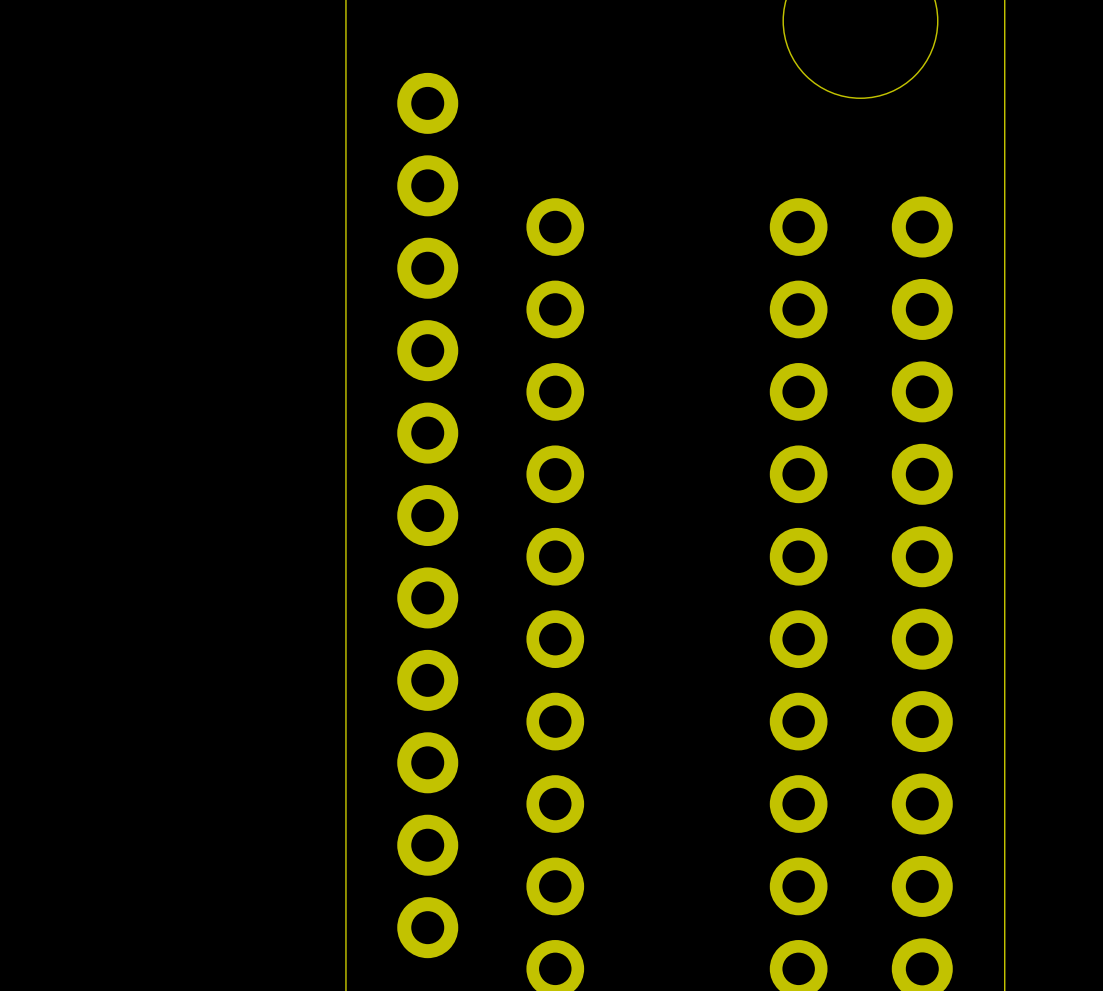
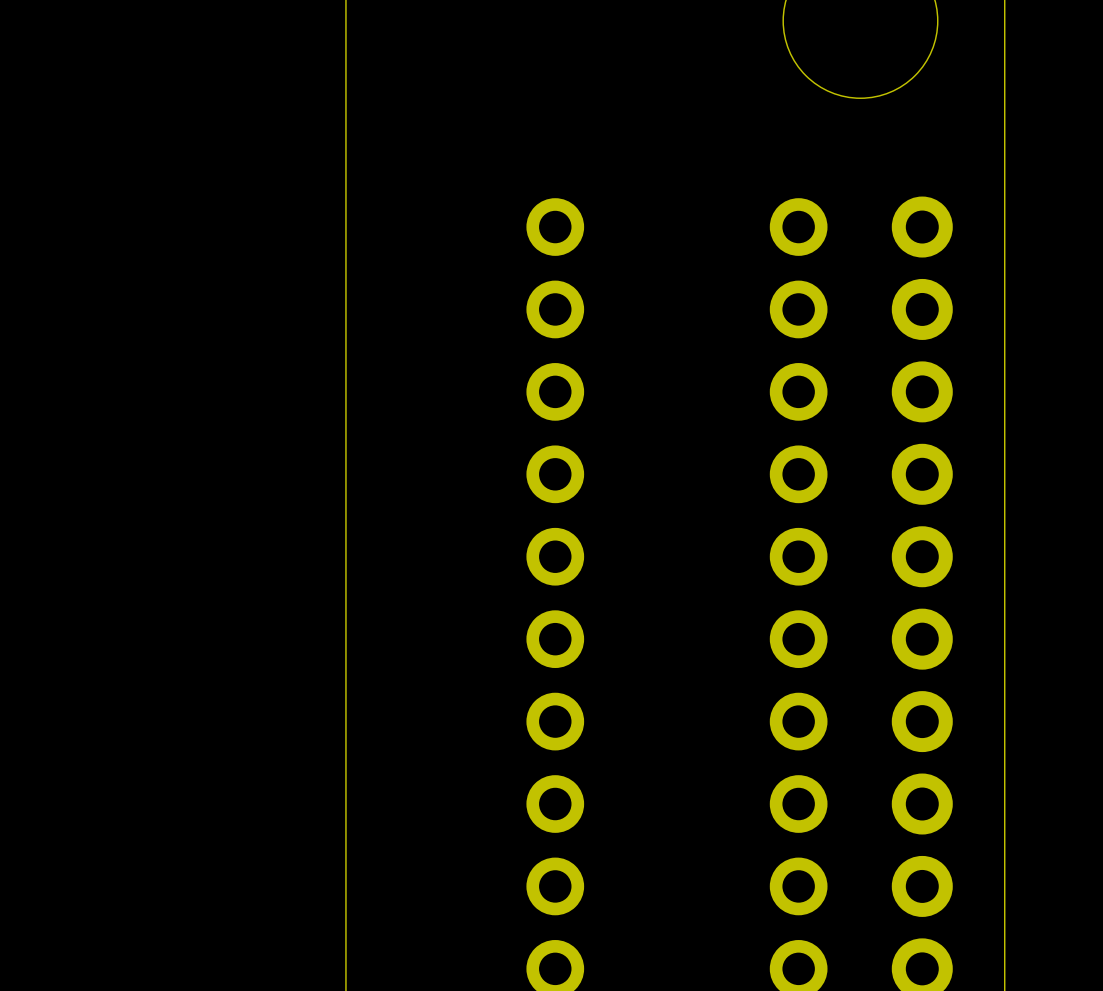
part: (427, 515) -> none

